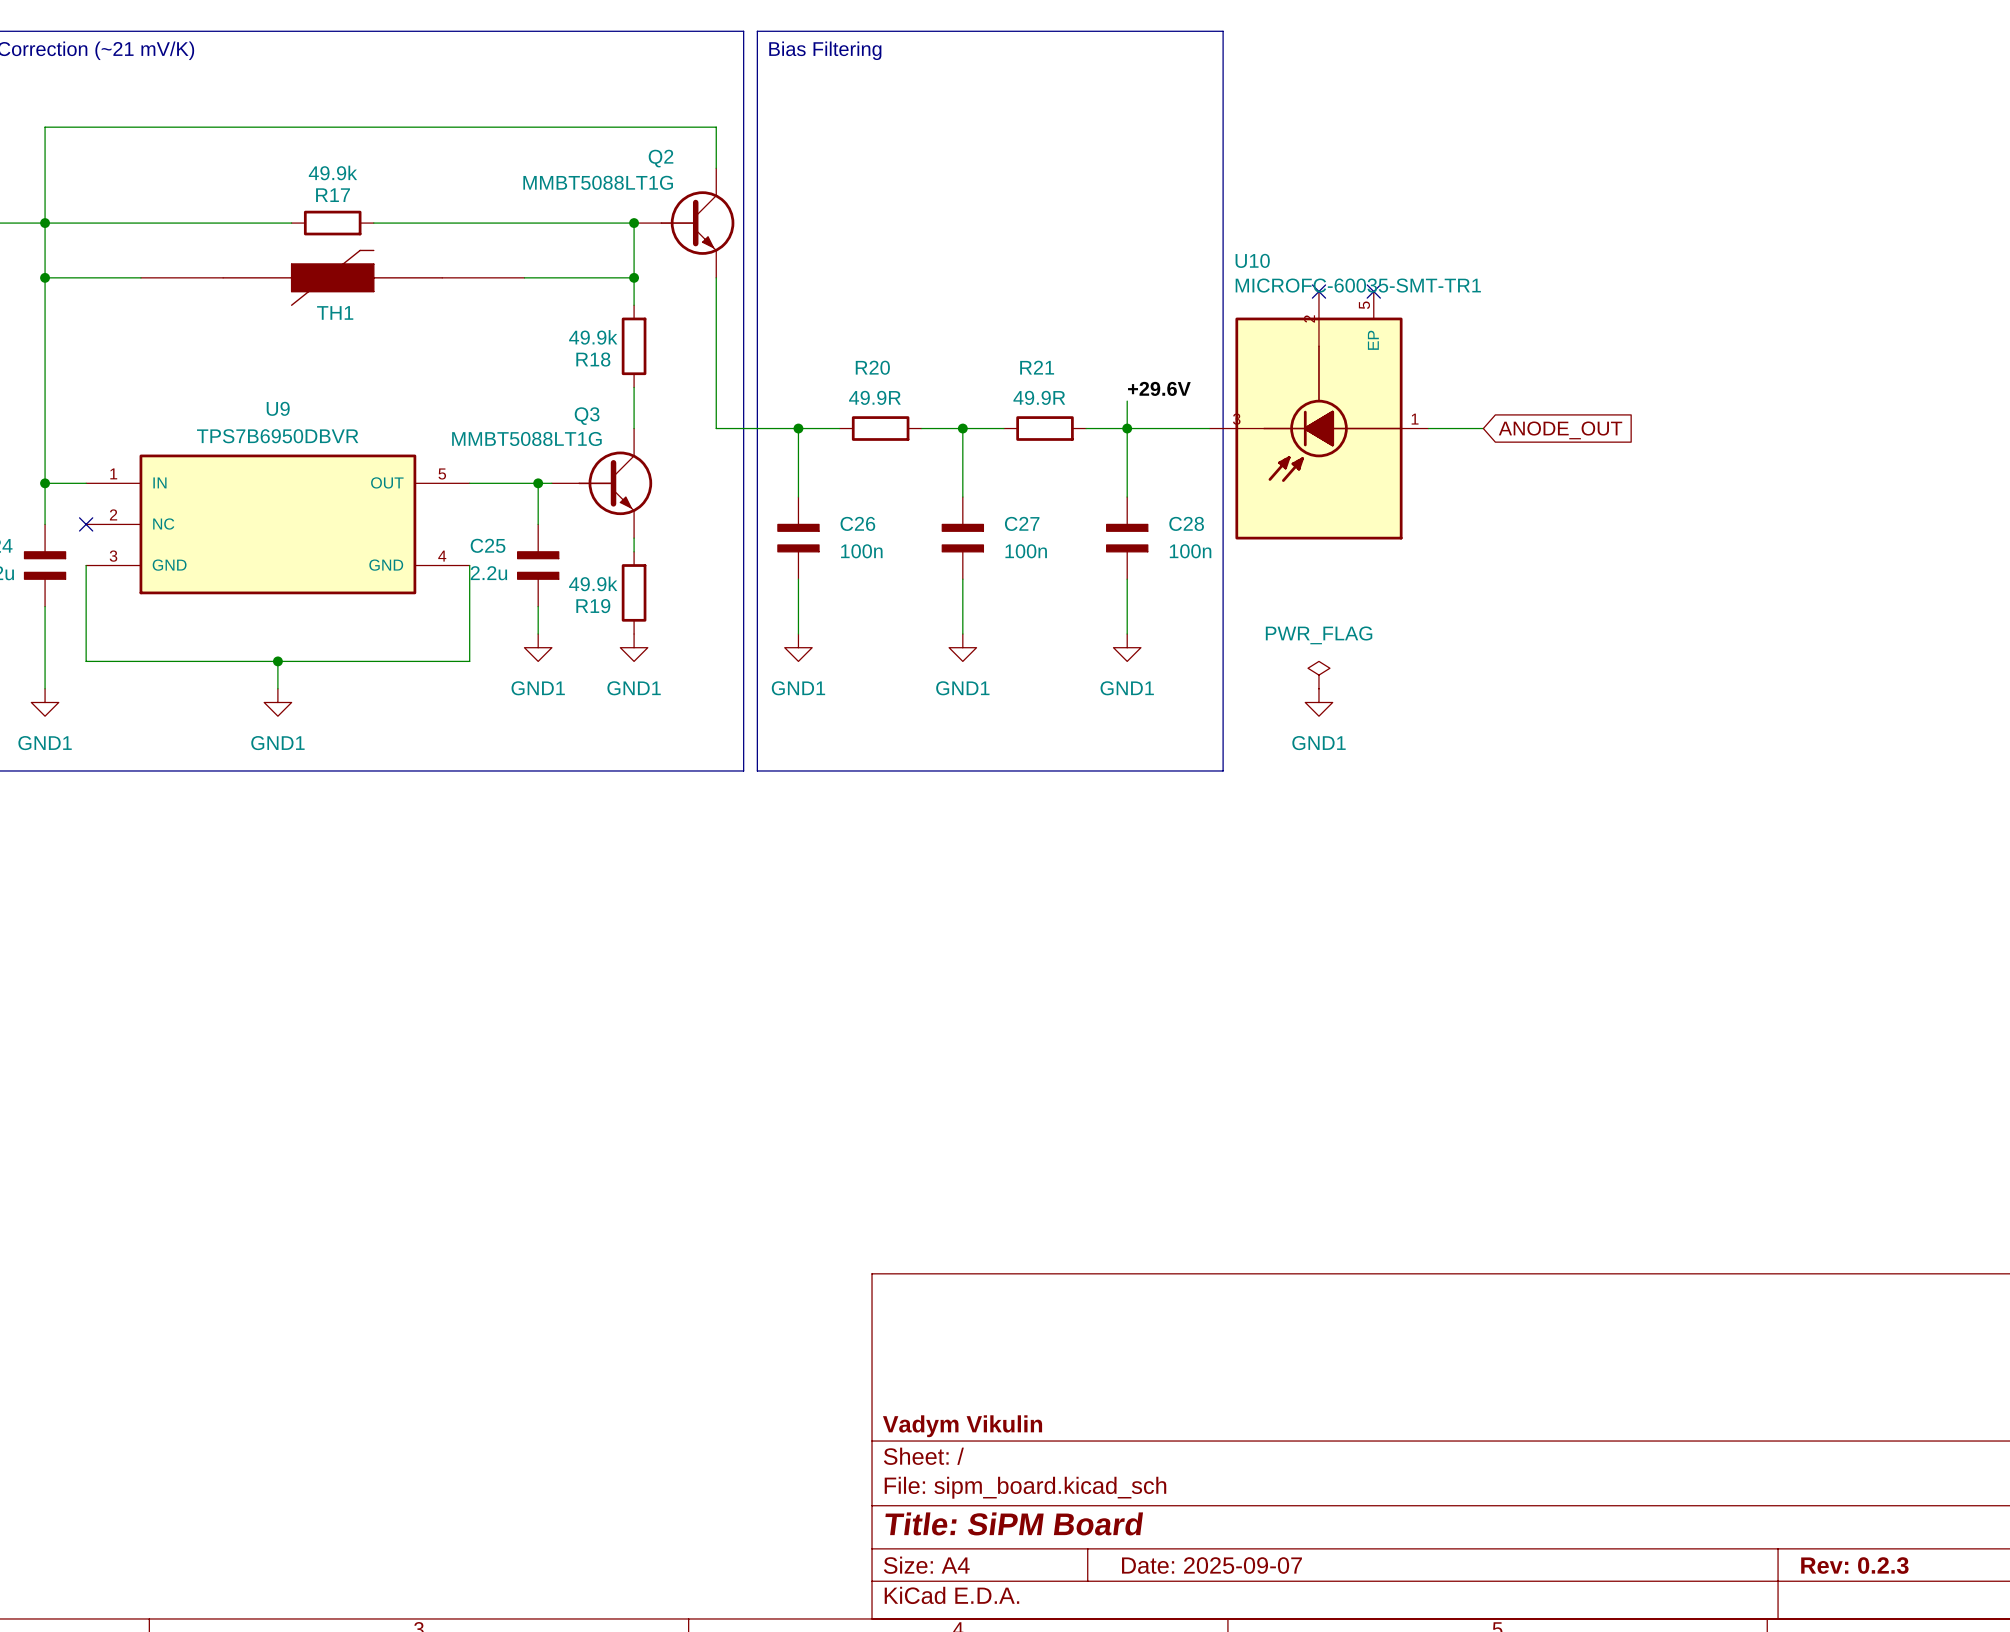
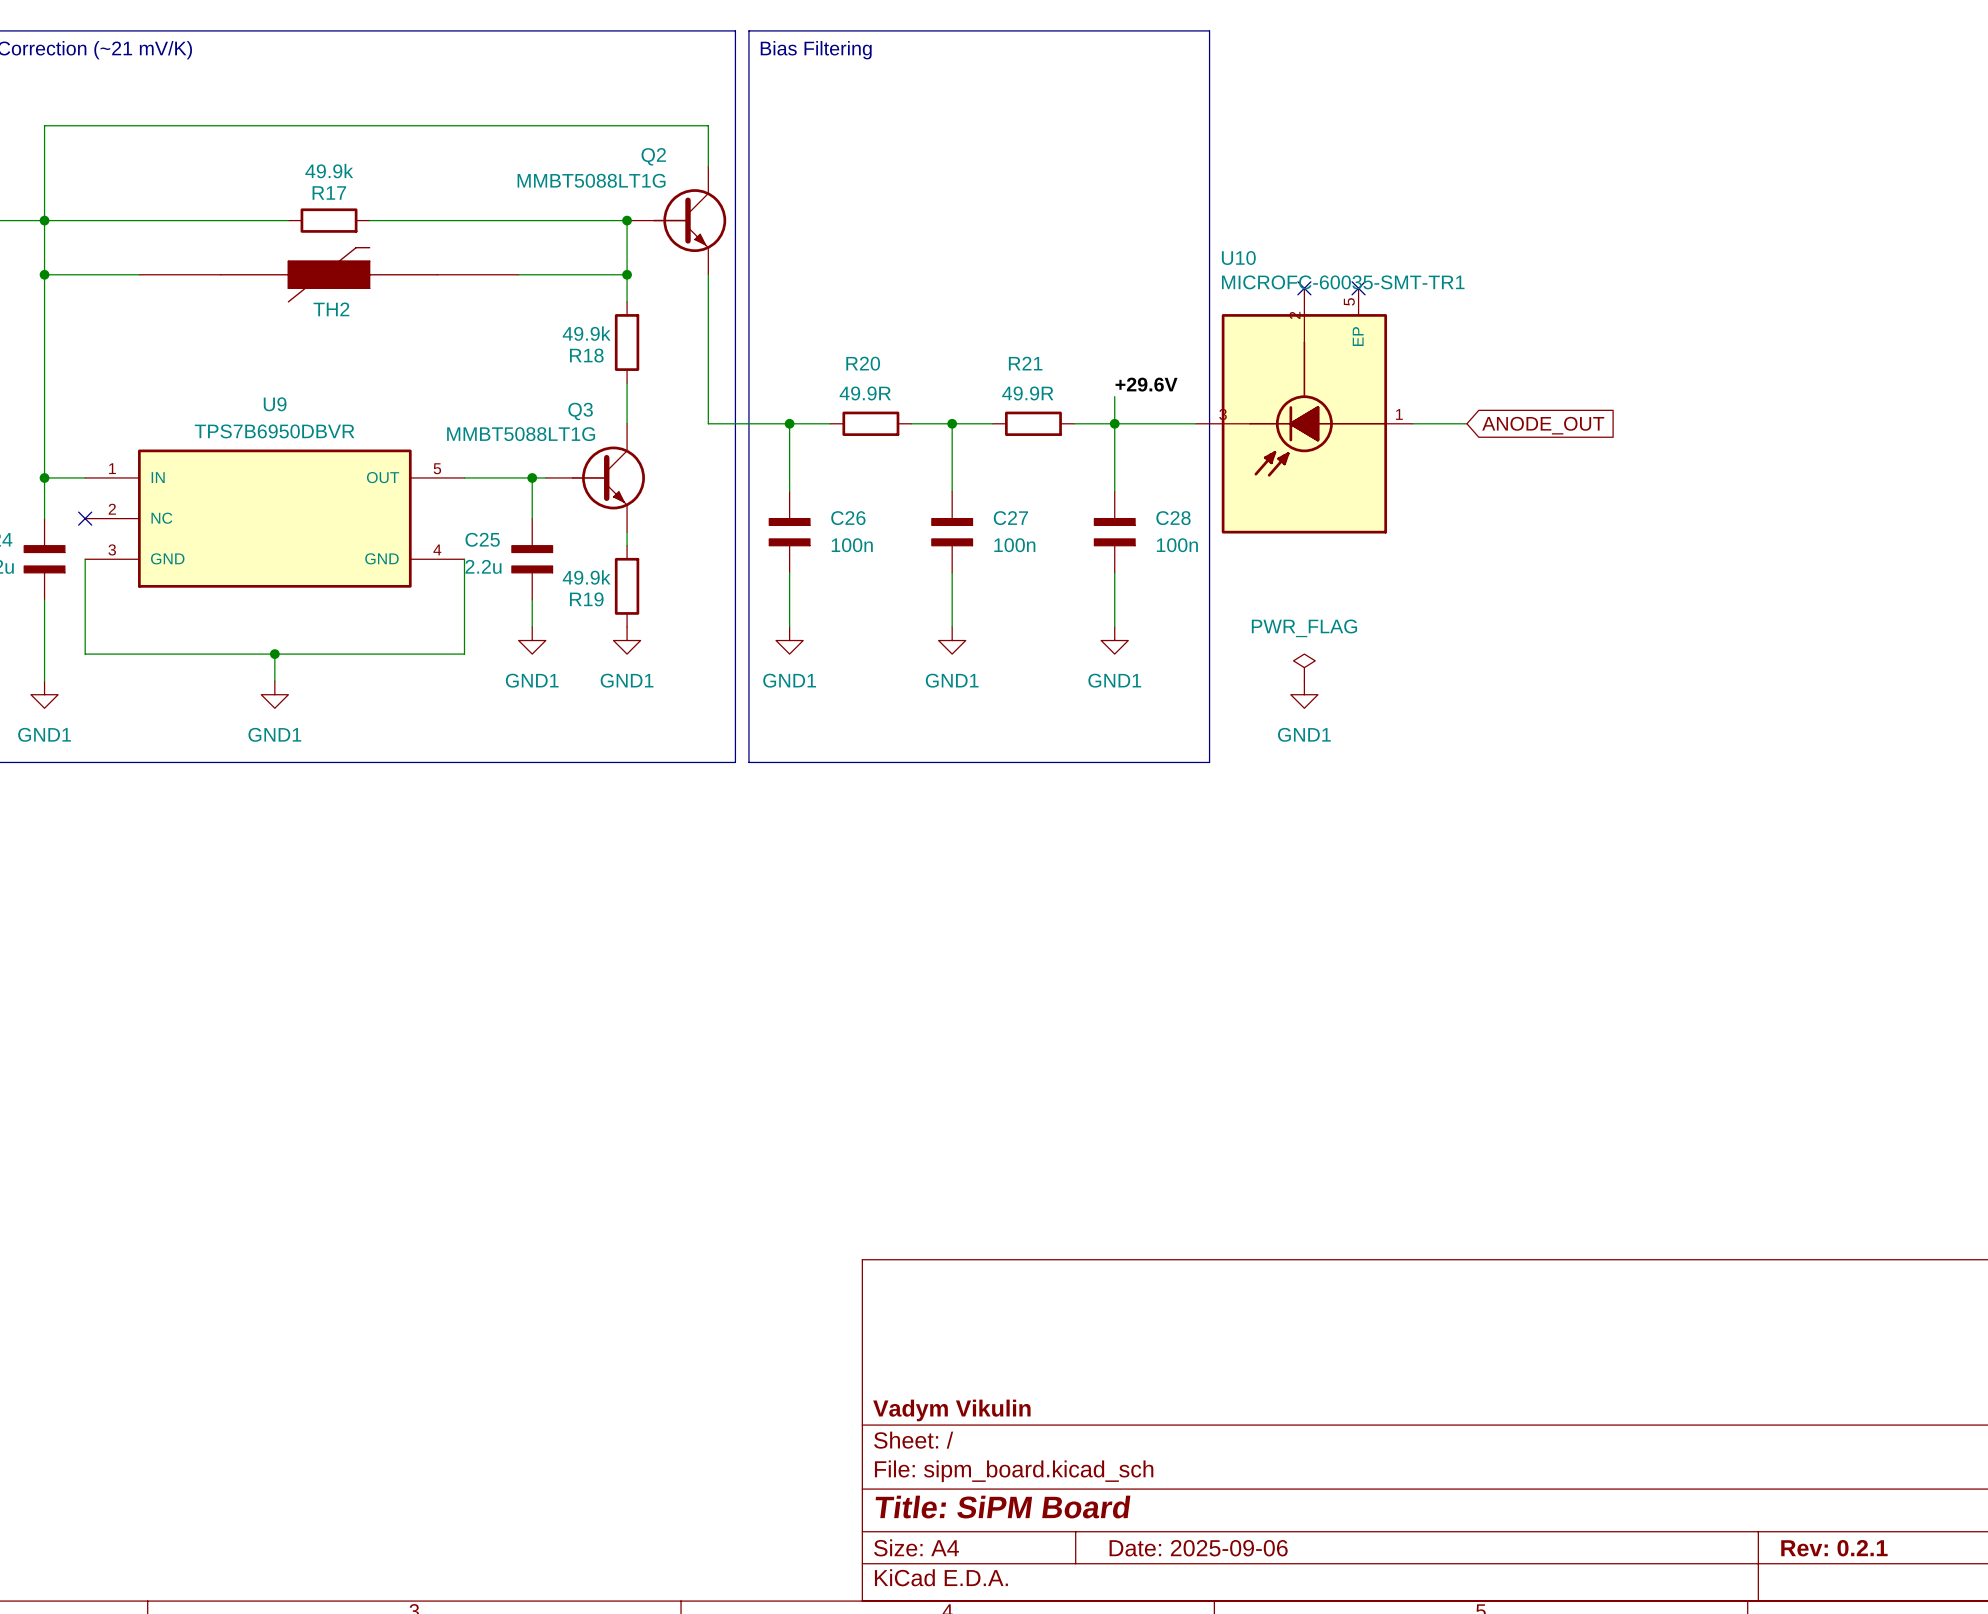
TH1 name: TH1 (335, 312) -> TH2 (331, 309)
title block: Date: 2025-09-07 (1211, 1565) -> Date: 2025-09-06 (1198, 1548)
title block: Rev: 0.2.3 (1854, 1565) -> Rev: 0.2.1 (1834, 1548)

